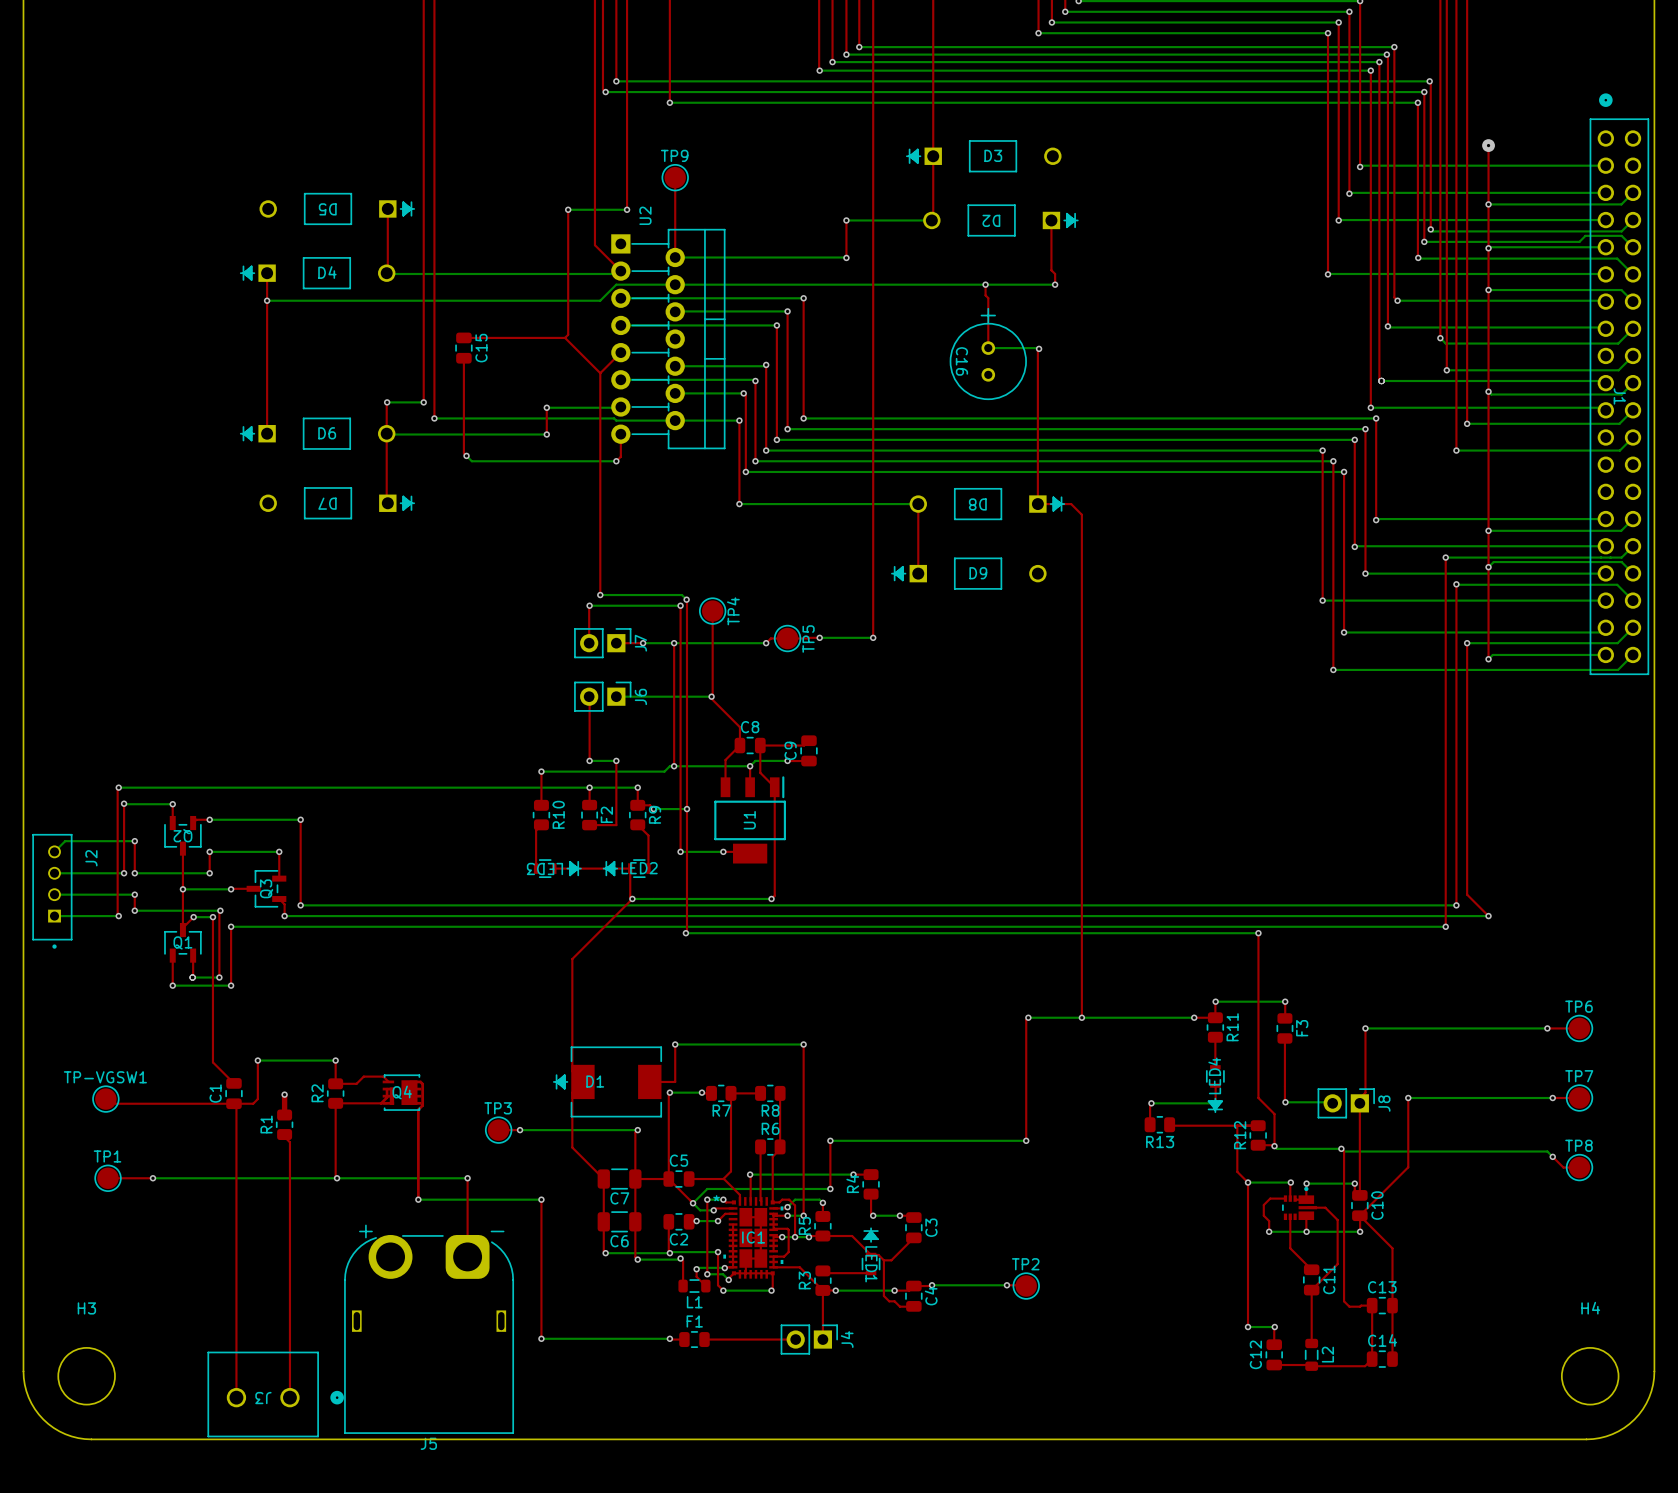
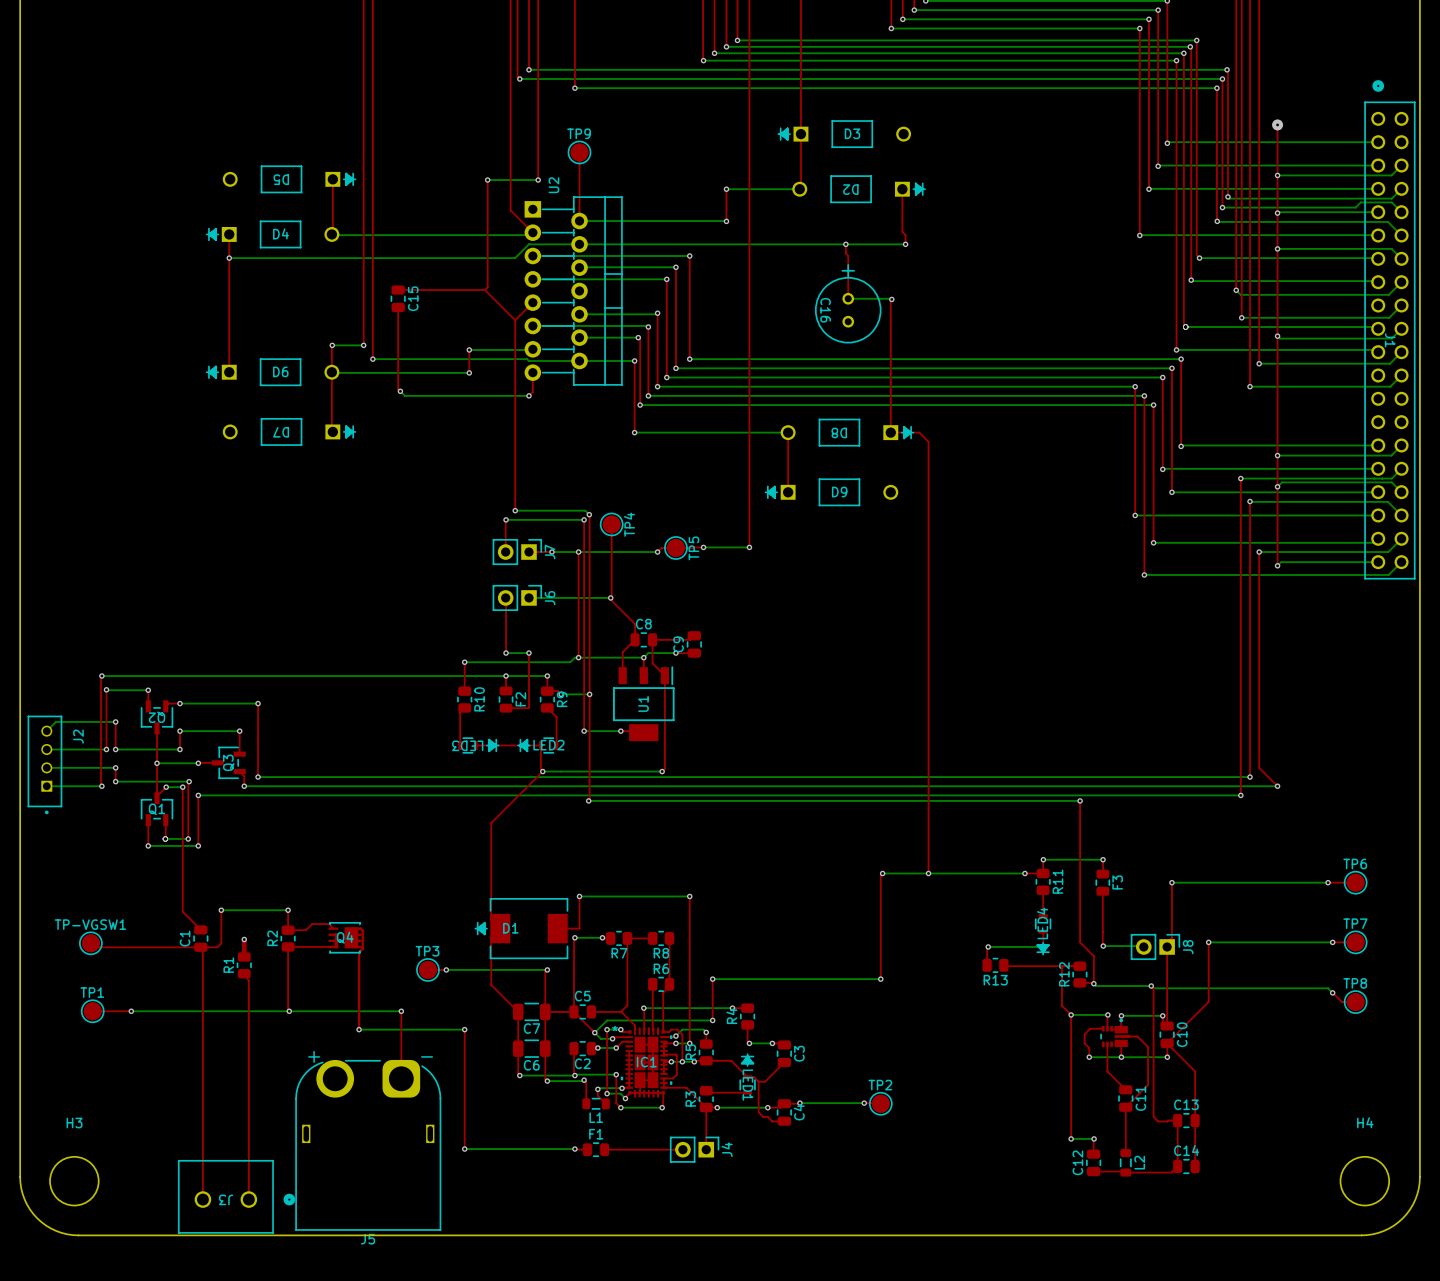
top track: (387, 1089) (387, 1097) (380, 1103) -> none

